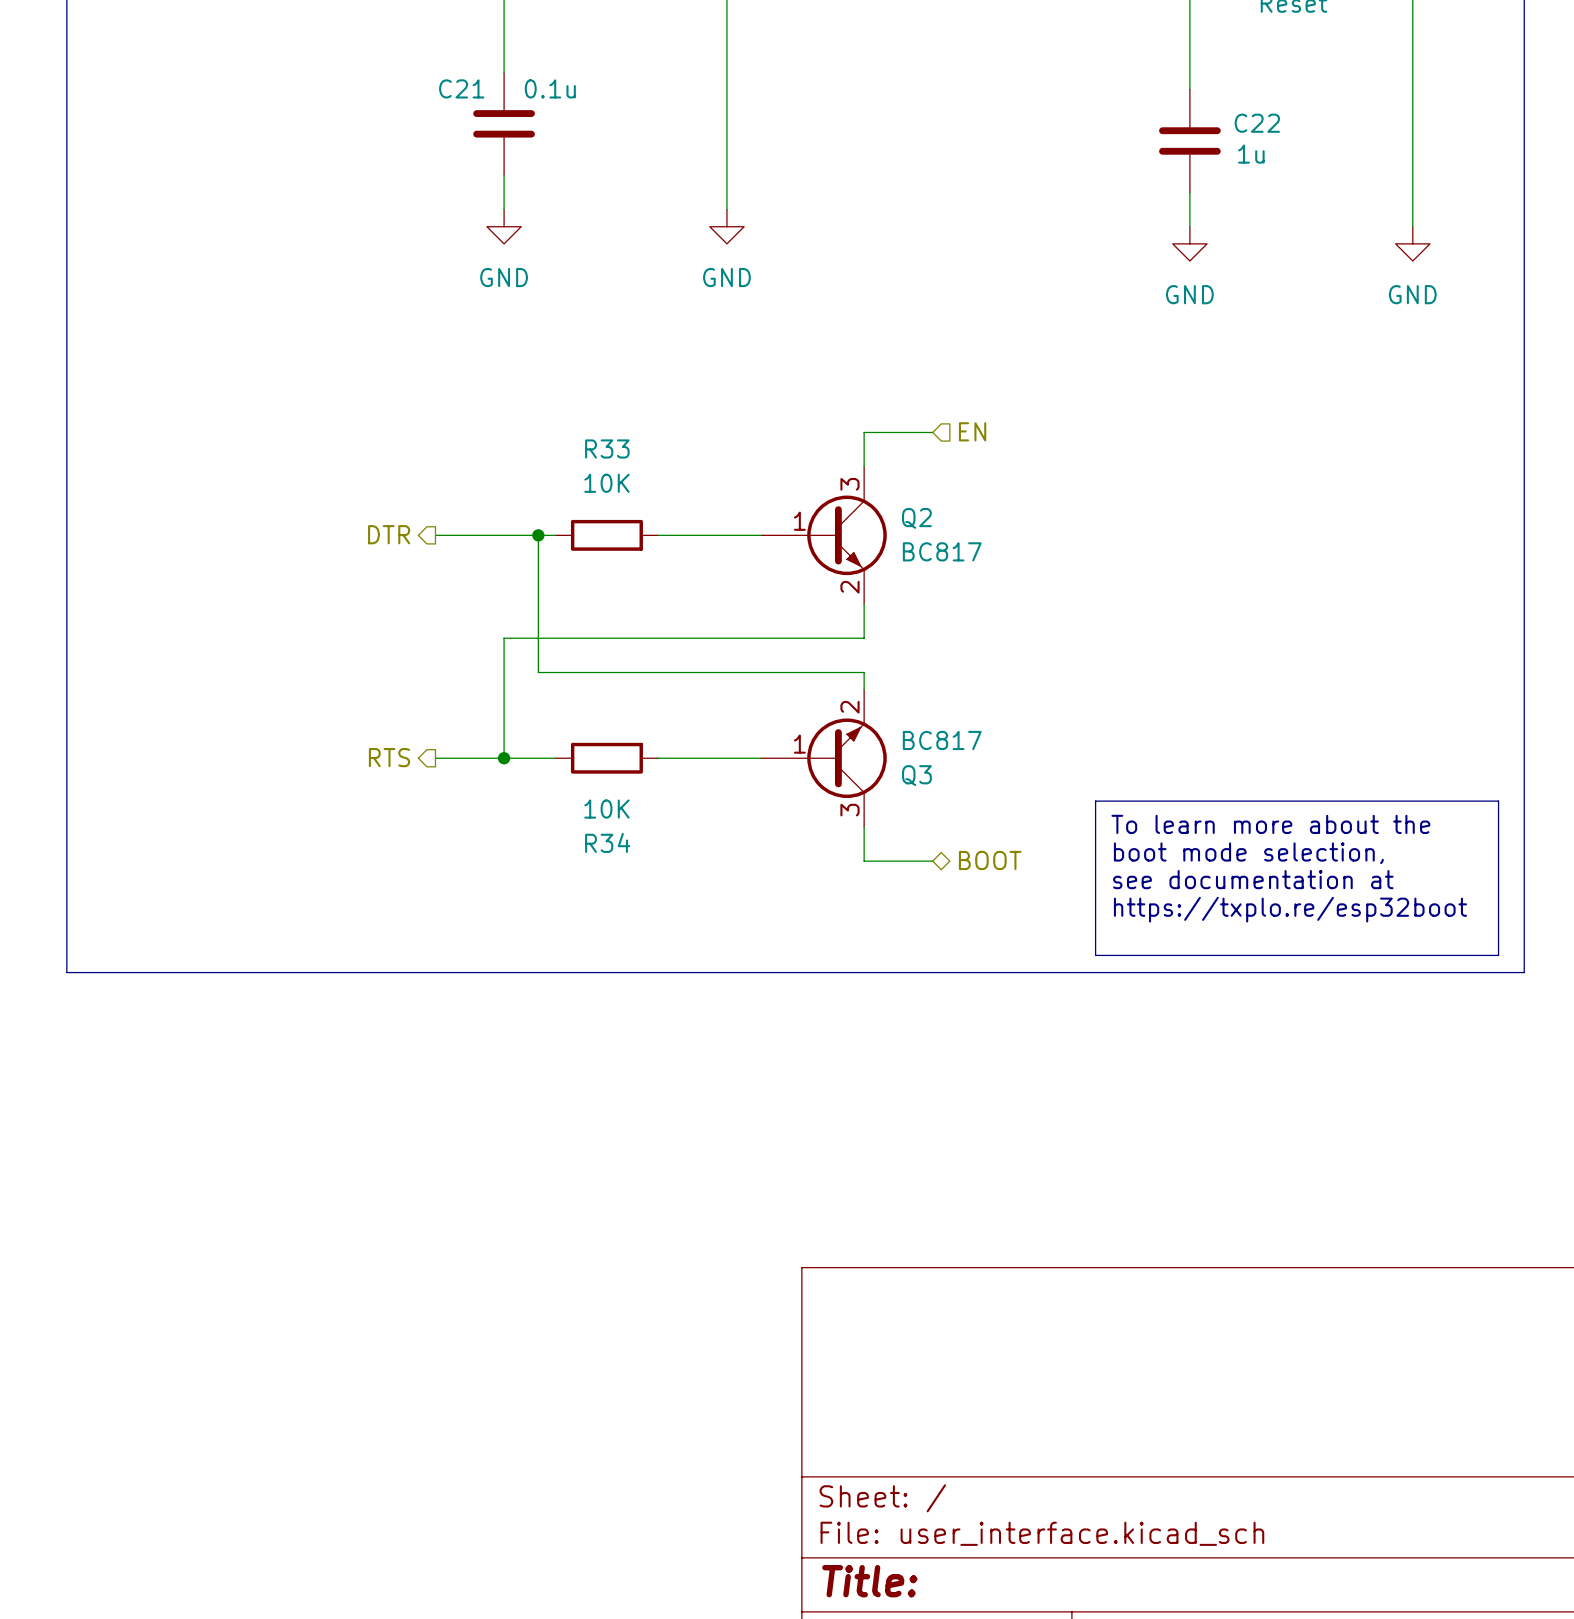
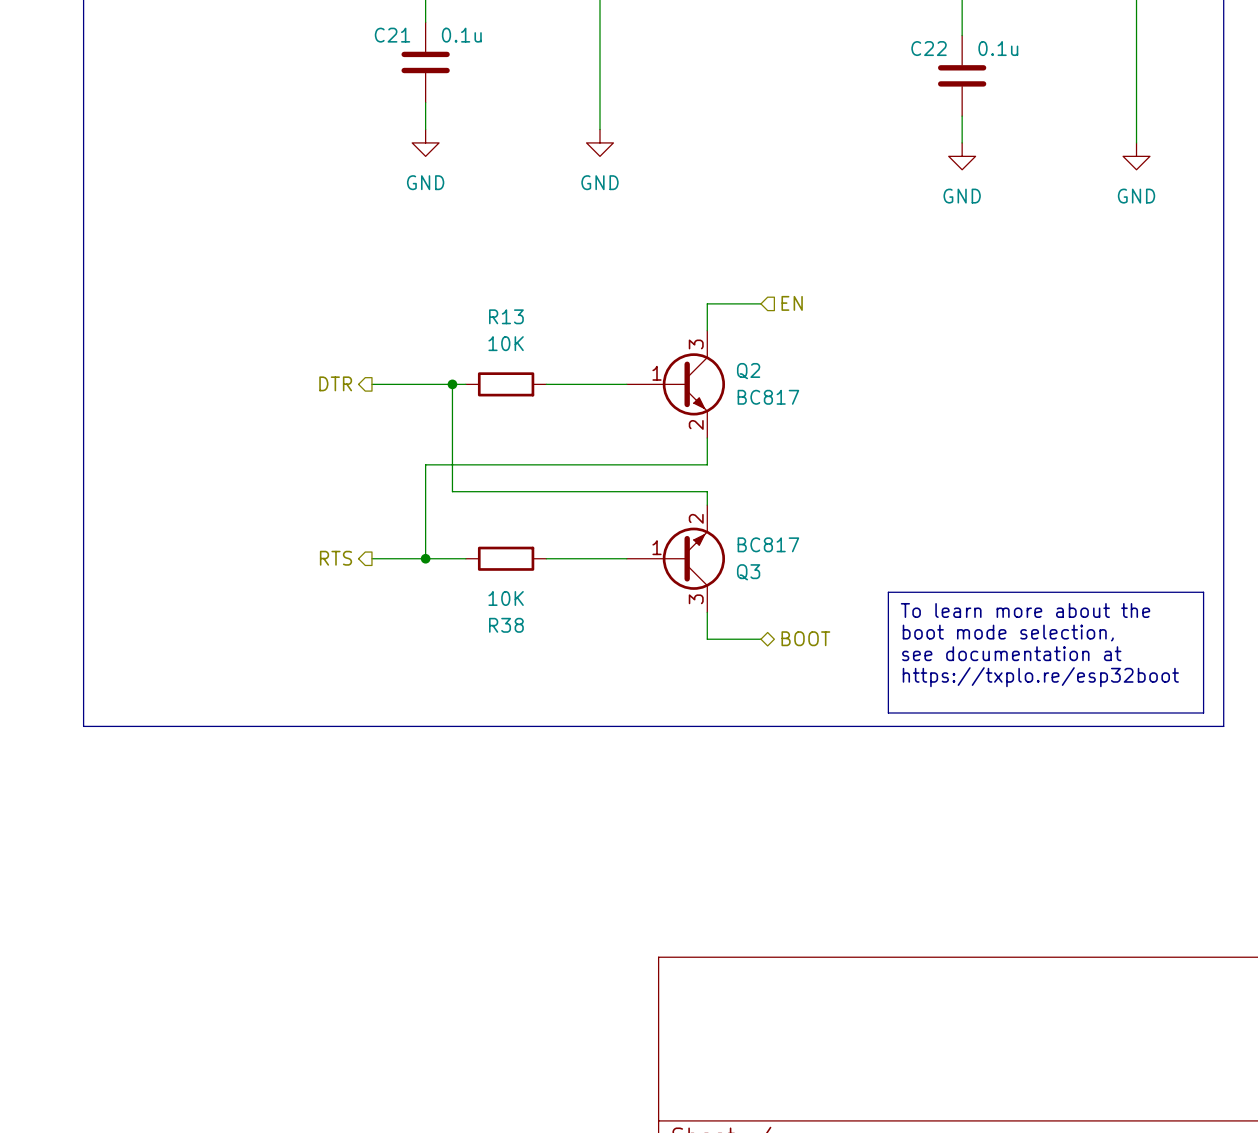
C22 name position: C22 (1257, 123) -> C22 (929, 48)
C22 value: 1u (1251, 154) -> 0.1u (998, 48)
R33 name: R33 (607, 448) -> R13 (506, 316)
R34 name: R34 (607, 842) -> R38 (506, 625)

